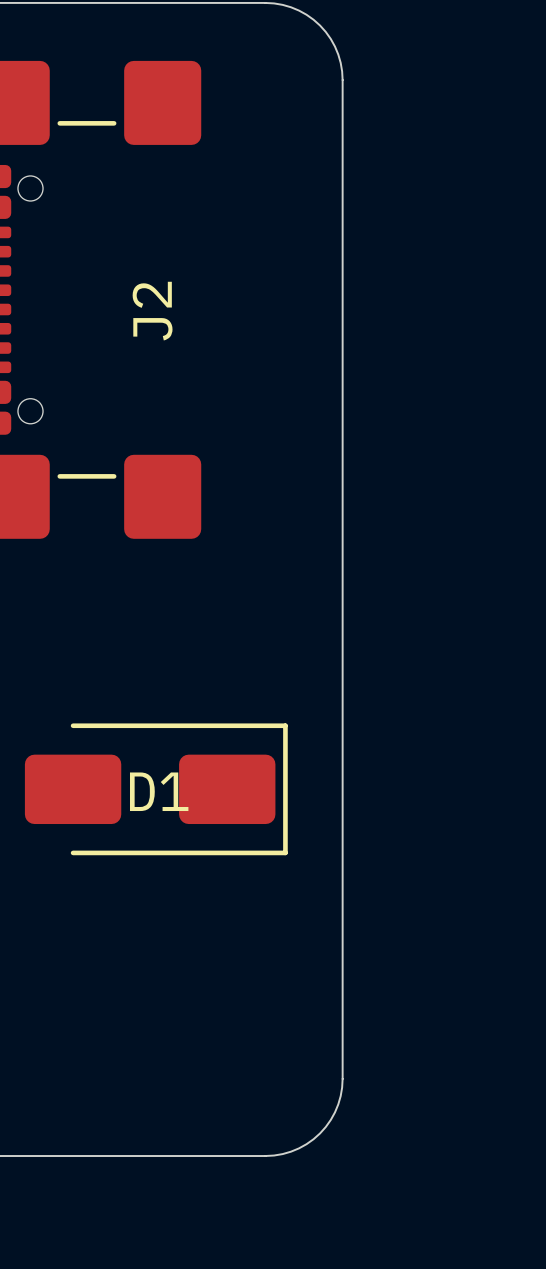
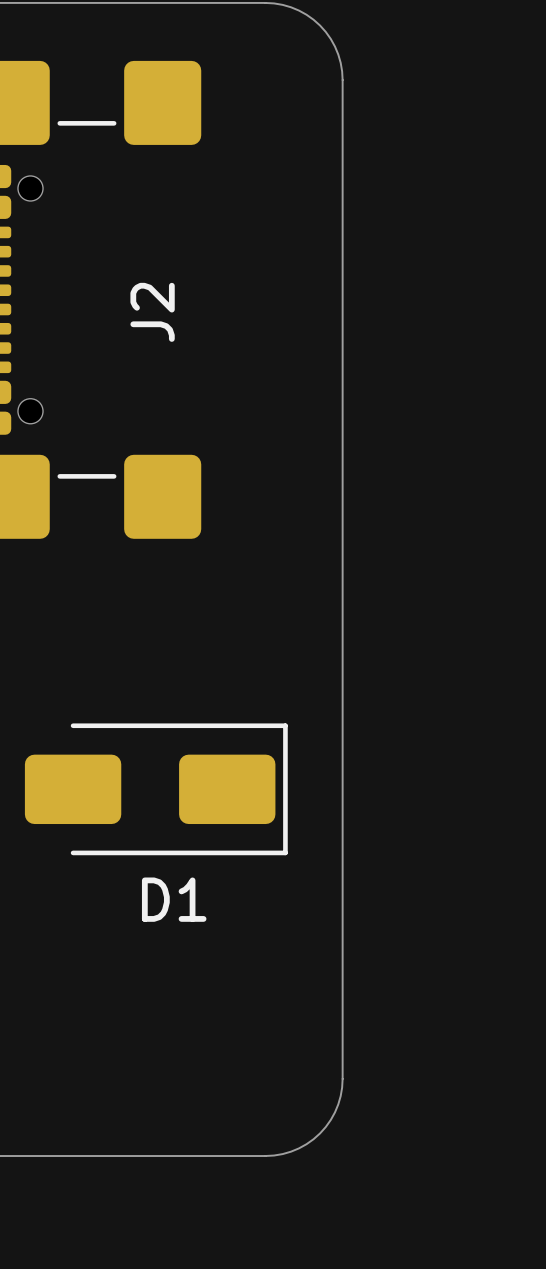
D1 name position: D1 (159, 791) -> D1 (174, 899)

